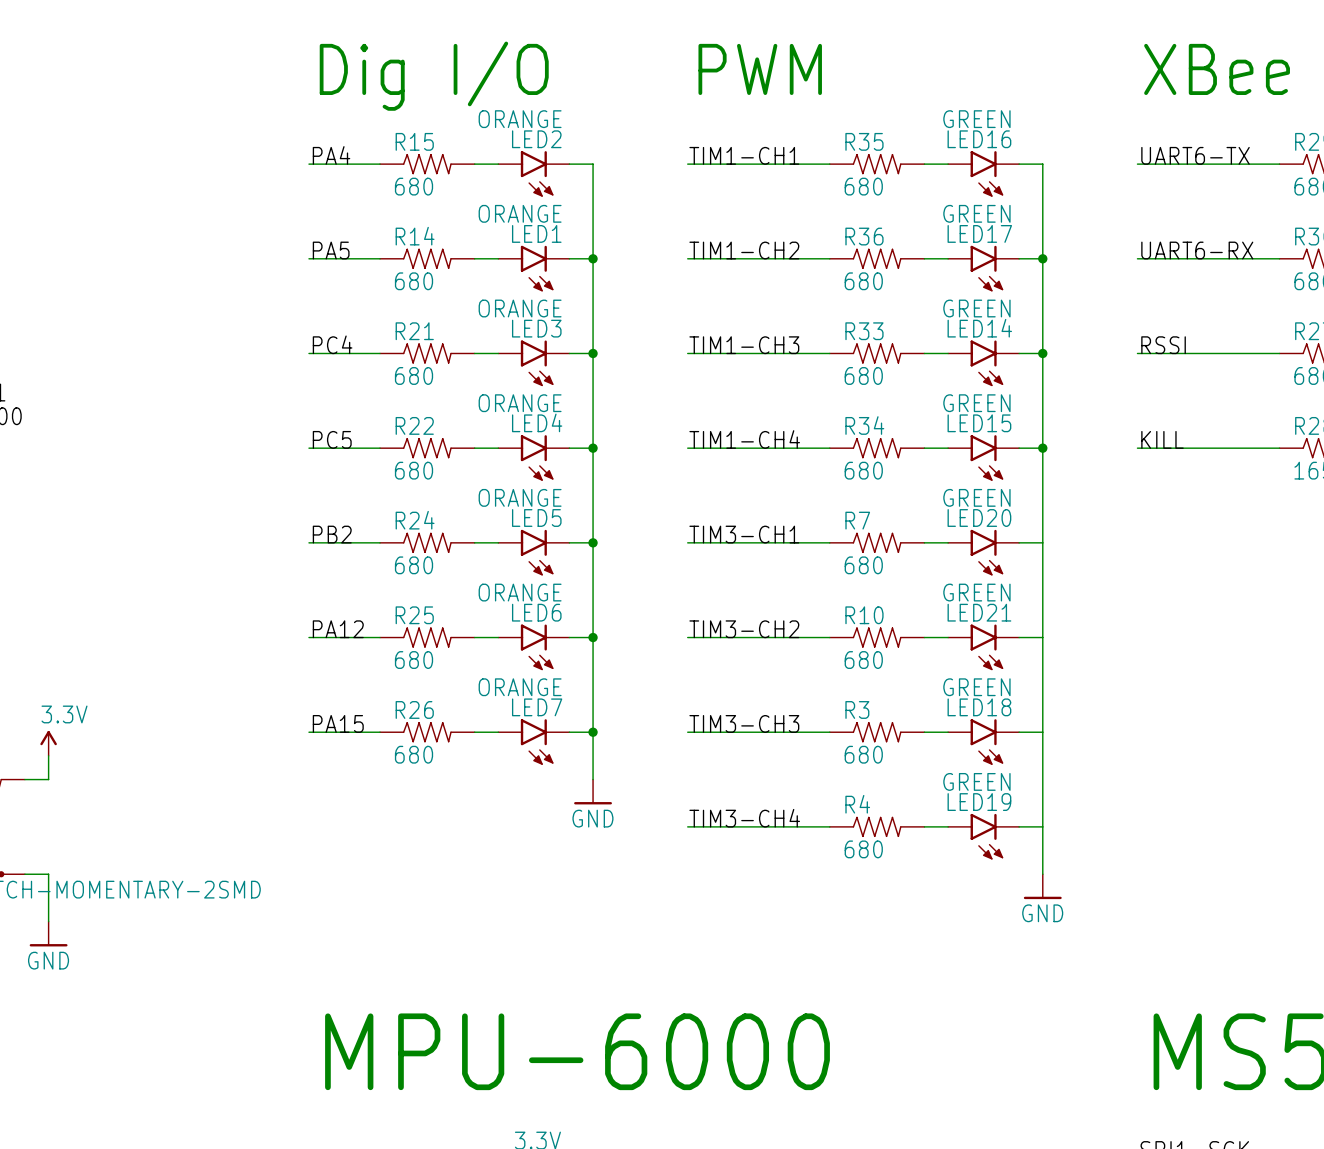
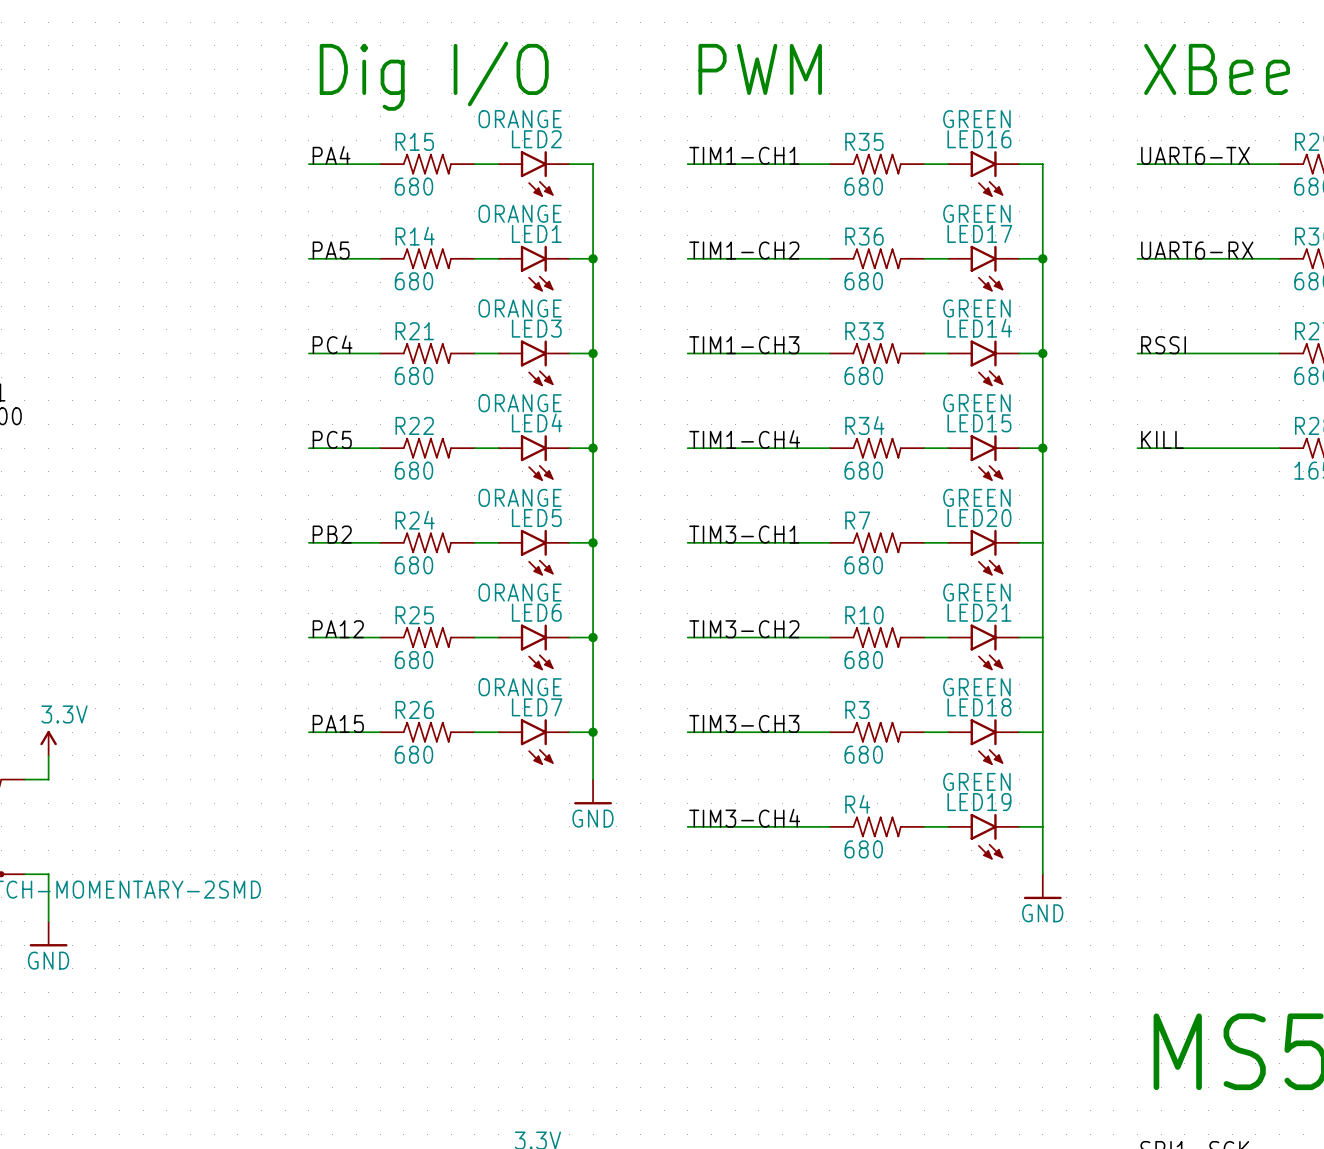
text: MPU-6000 (577, 1051) -> none

